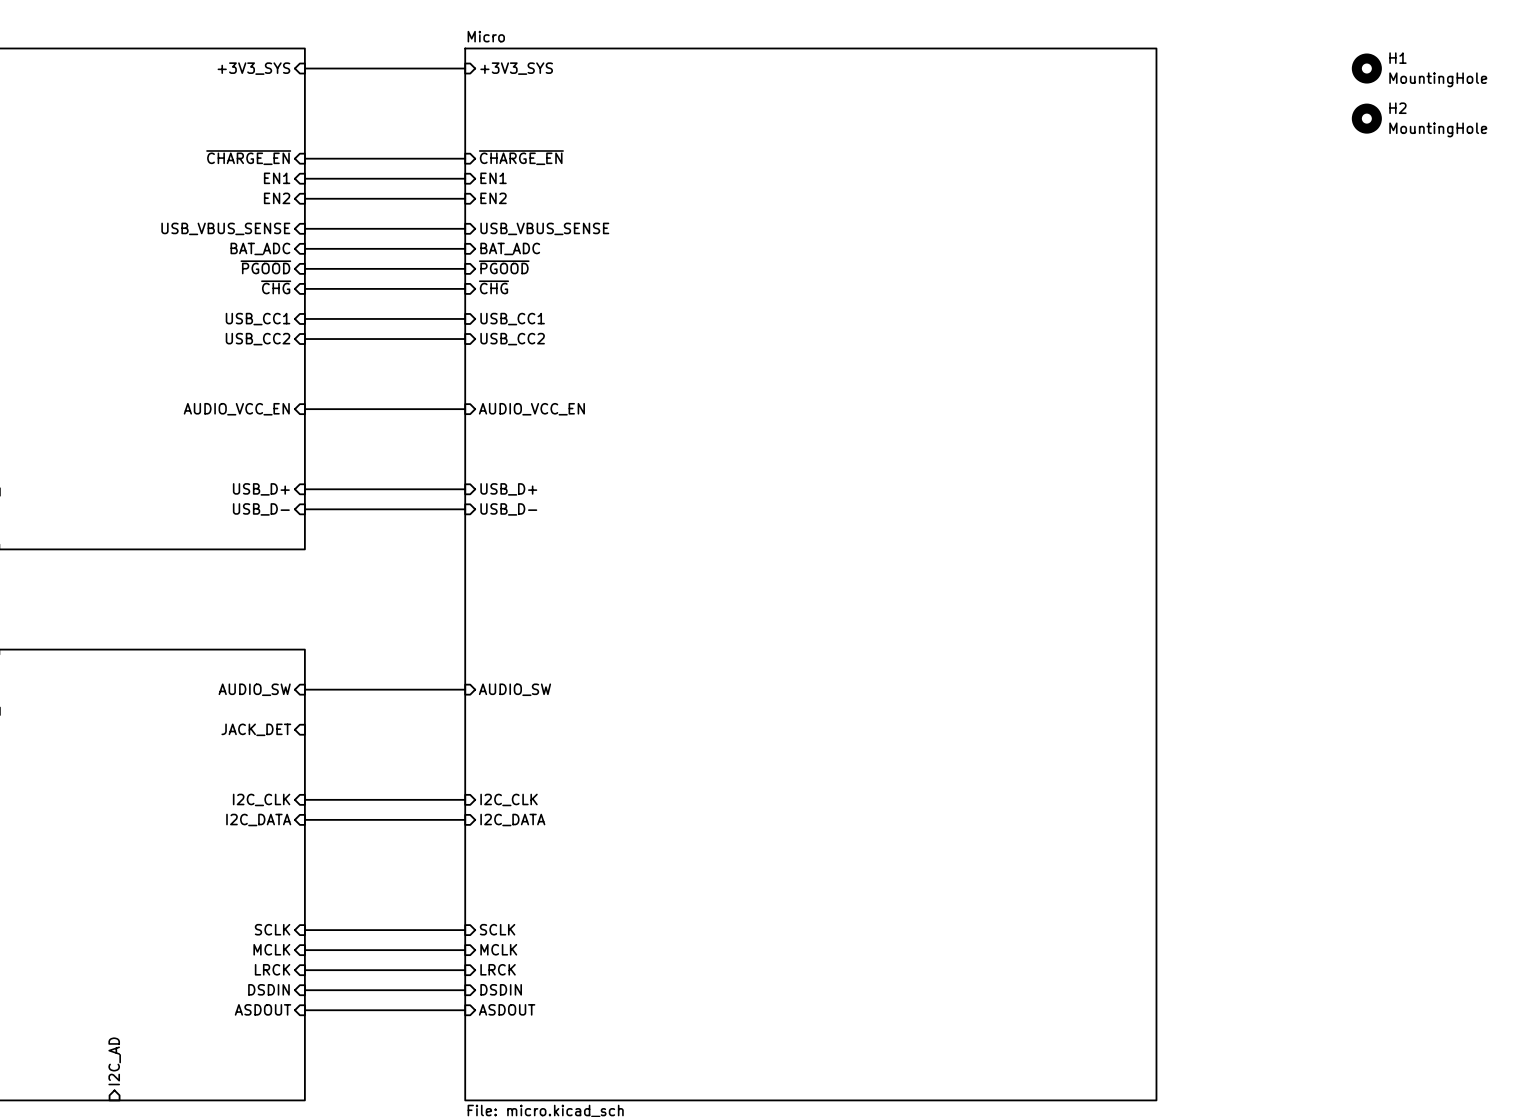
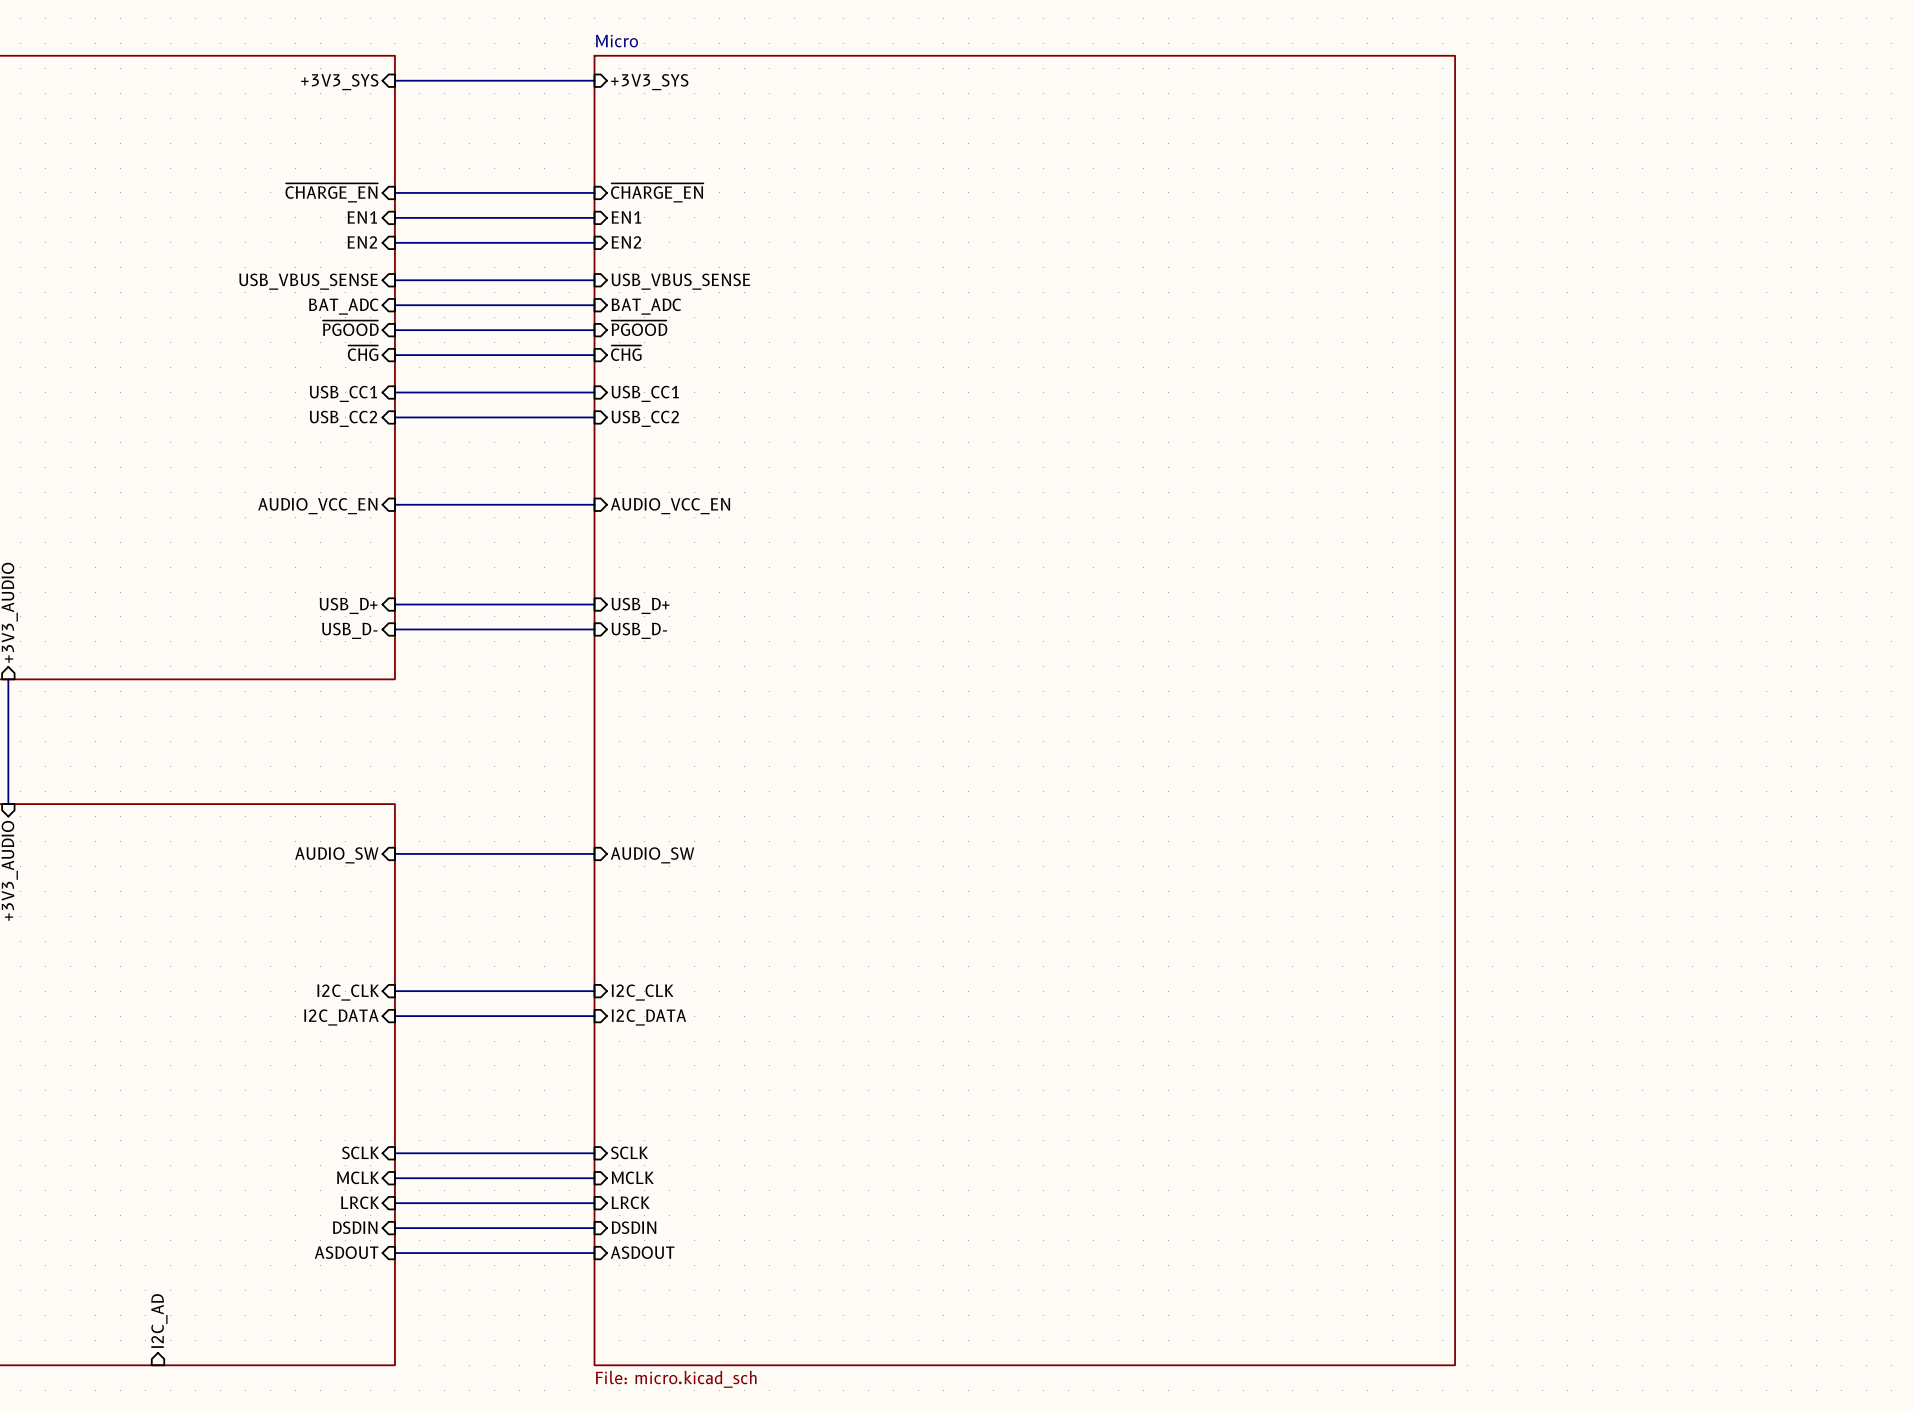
H1: MountingHole (1366, 68) -> none
H2: MountingHole (1366, 118) -> none
sheet pin: JACK_DET (256, 729) -> none

